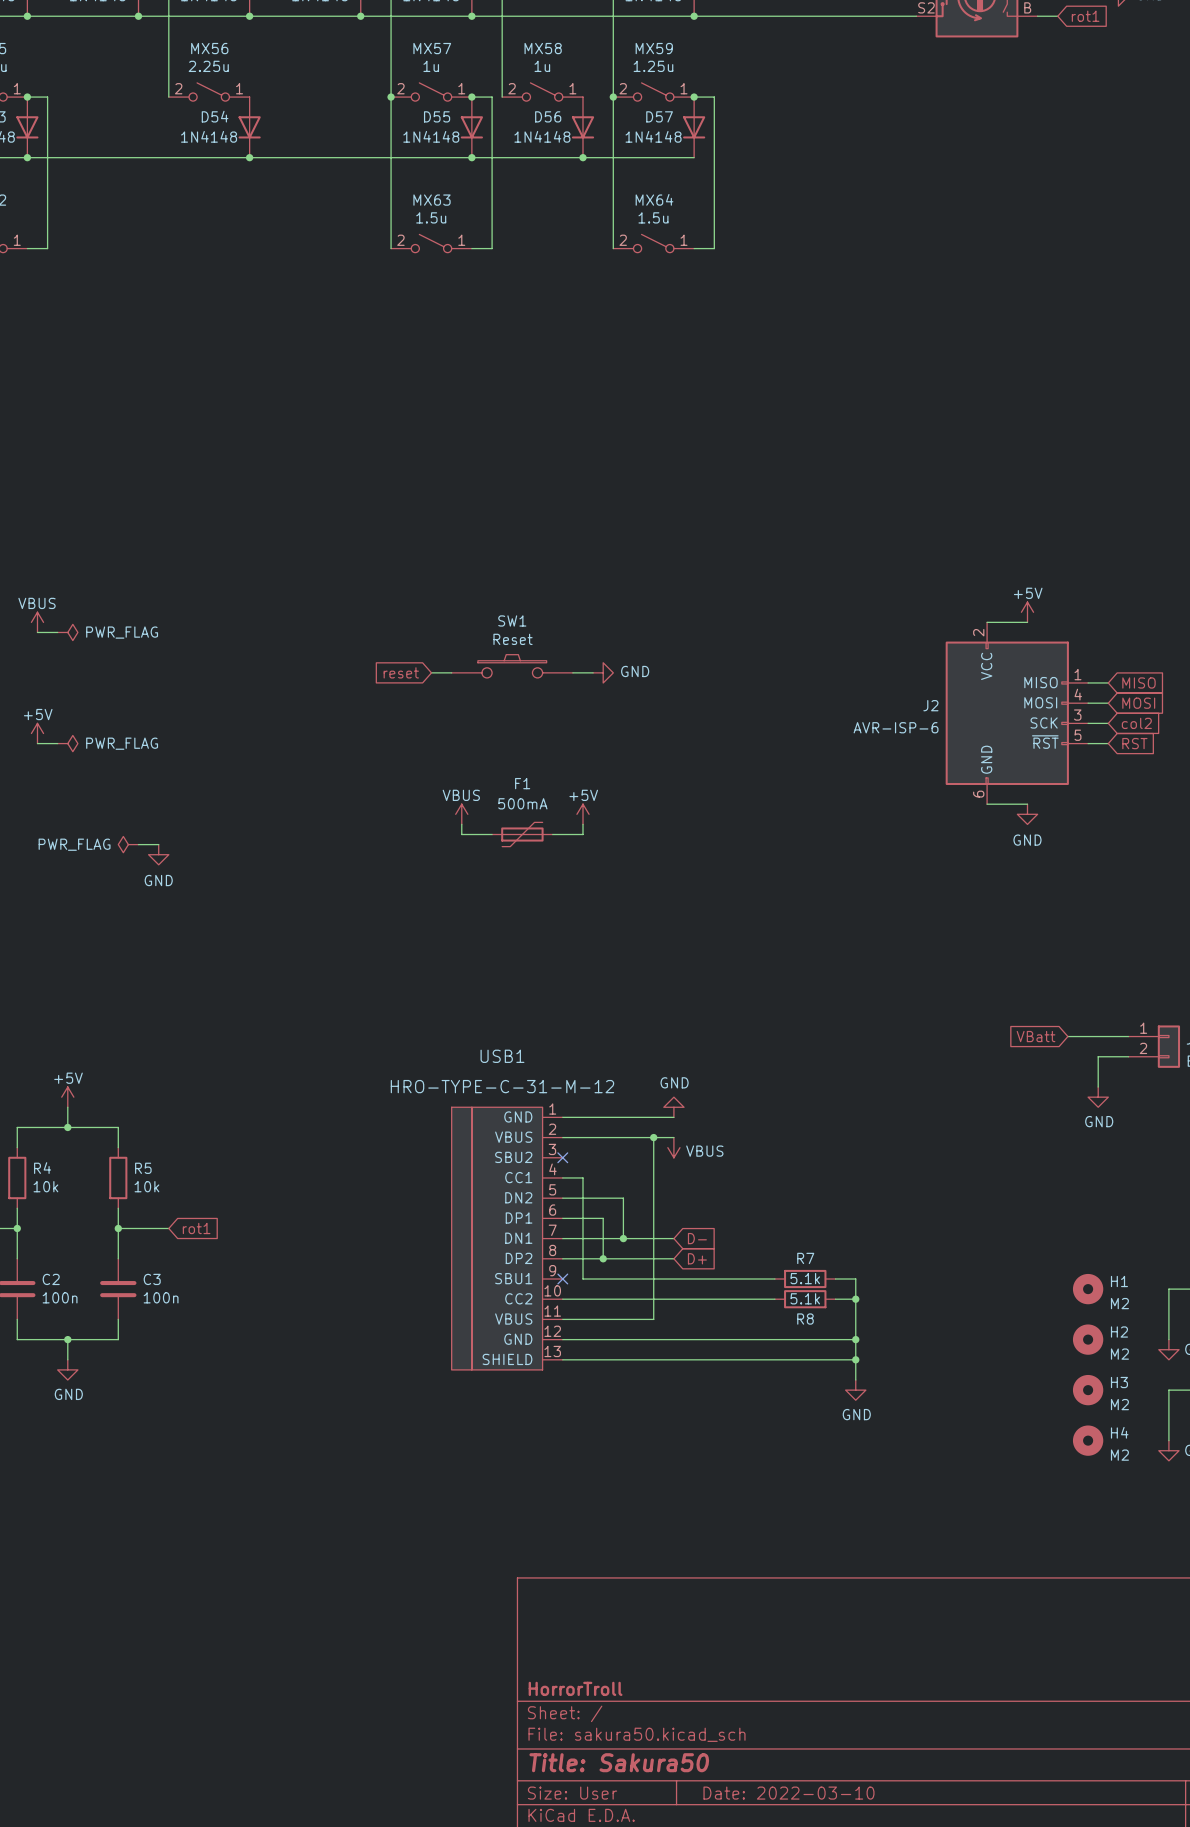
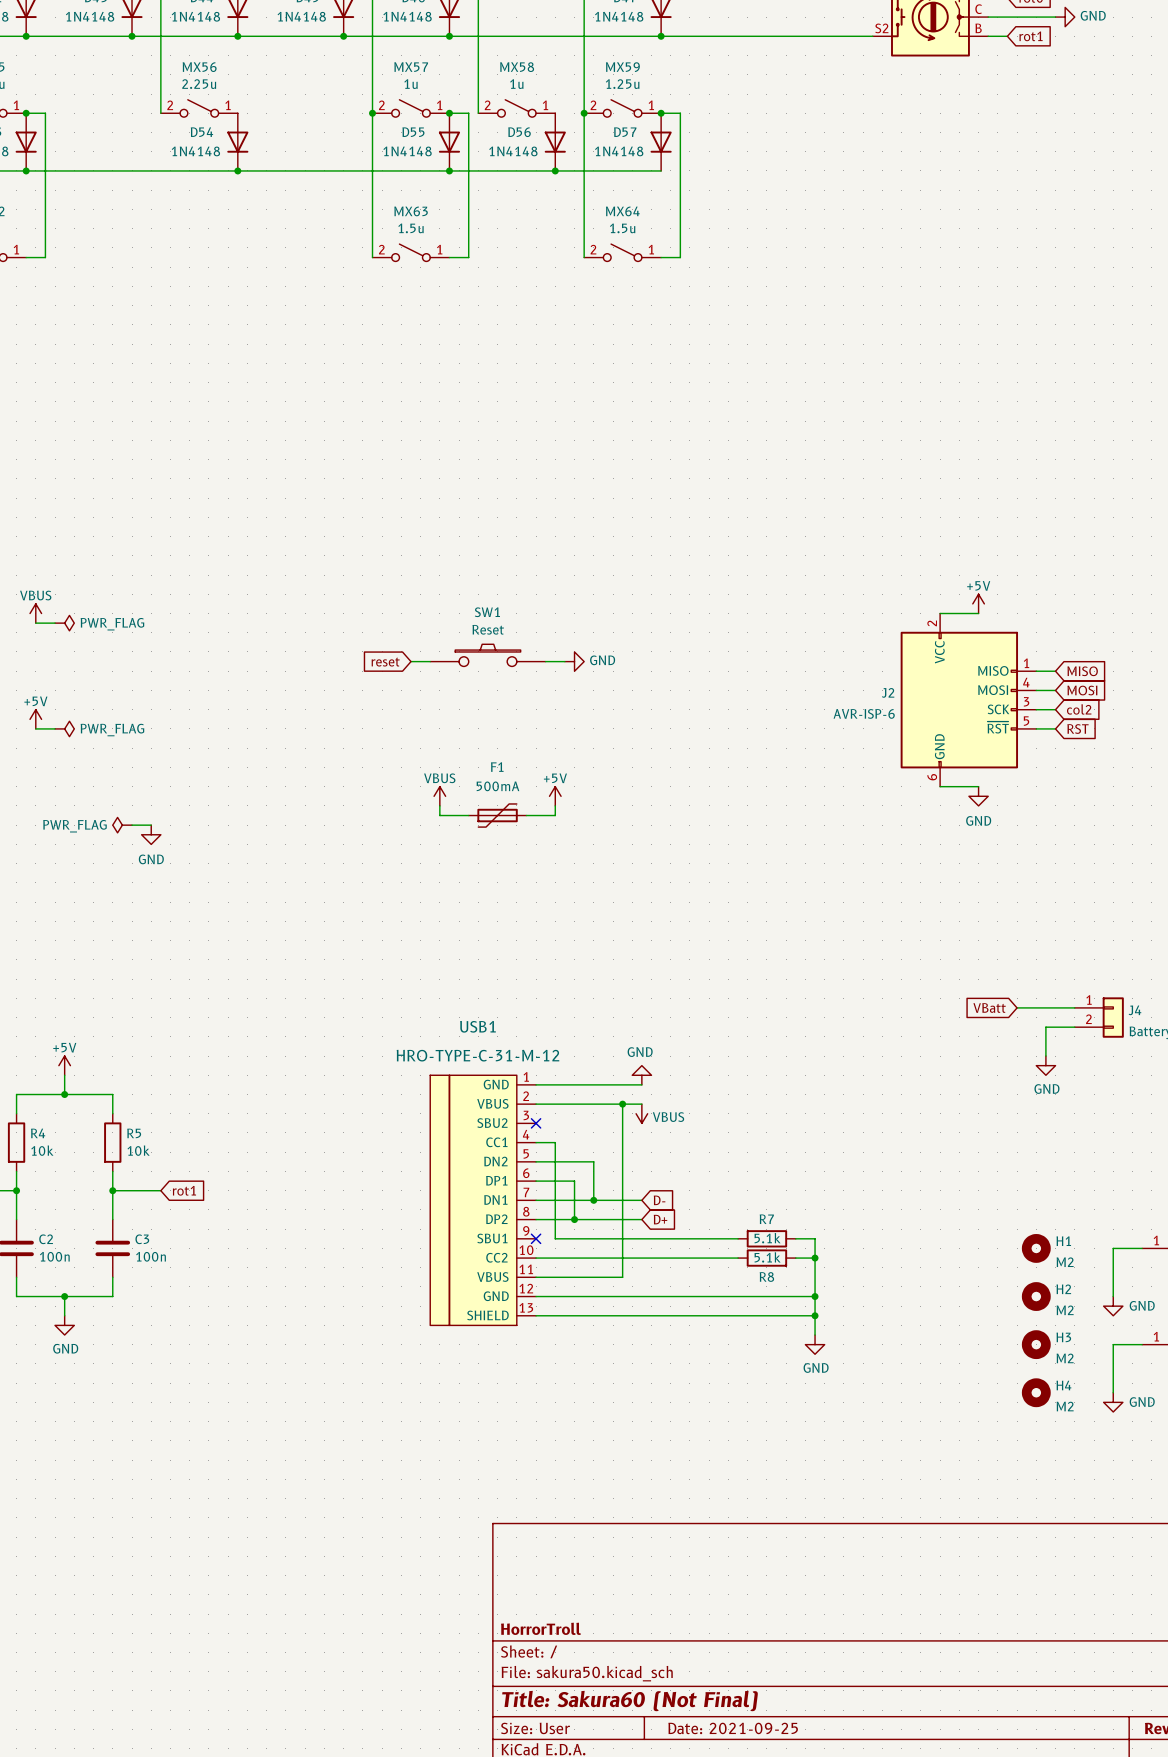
title block: Title: Sakura50 (619, 1762) -> Title: Sakura60 (Not Final) (629, 1701)
title block: Date: 2022-03-10 (788, 1793) -> Date: 2021-09-25 (733, 1728)

